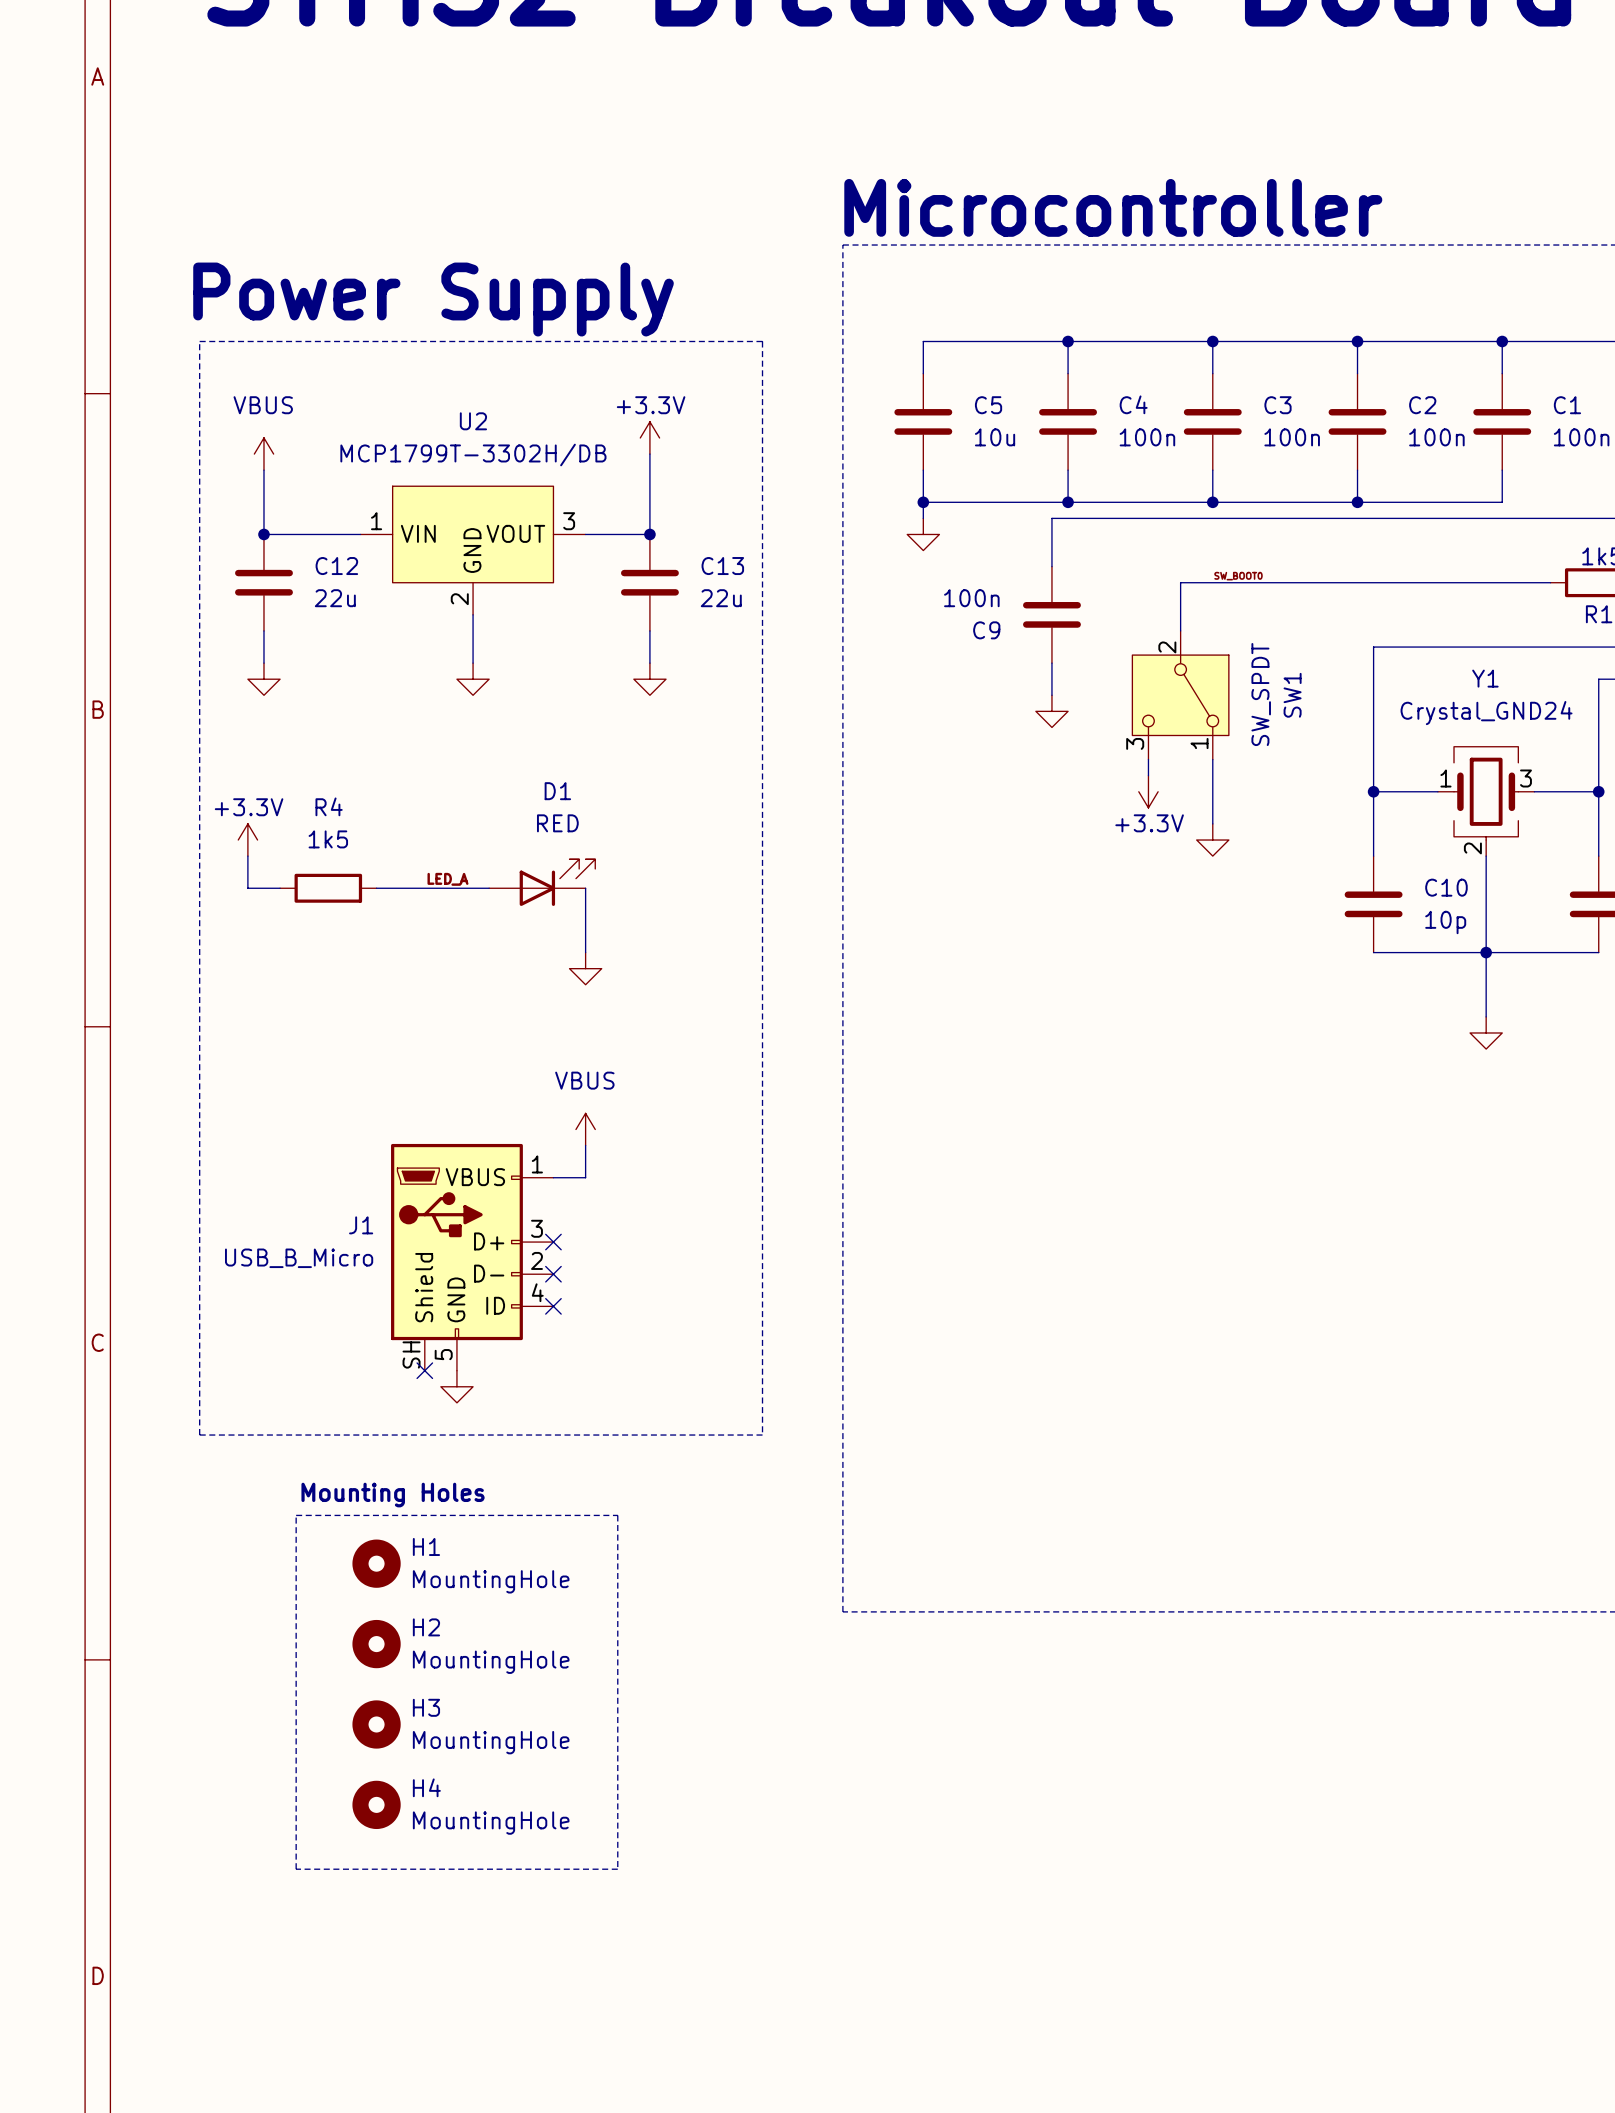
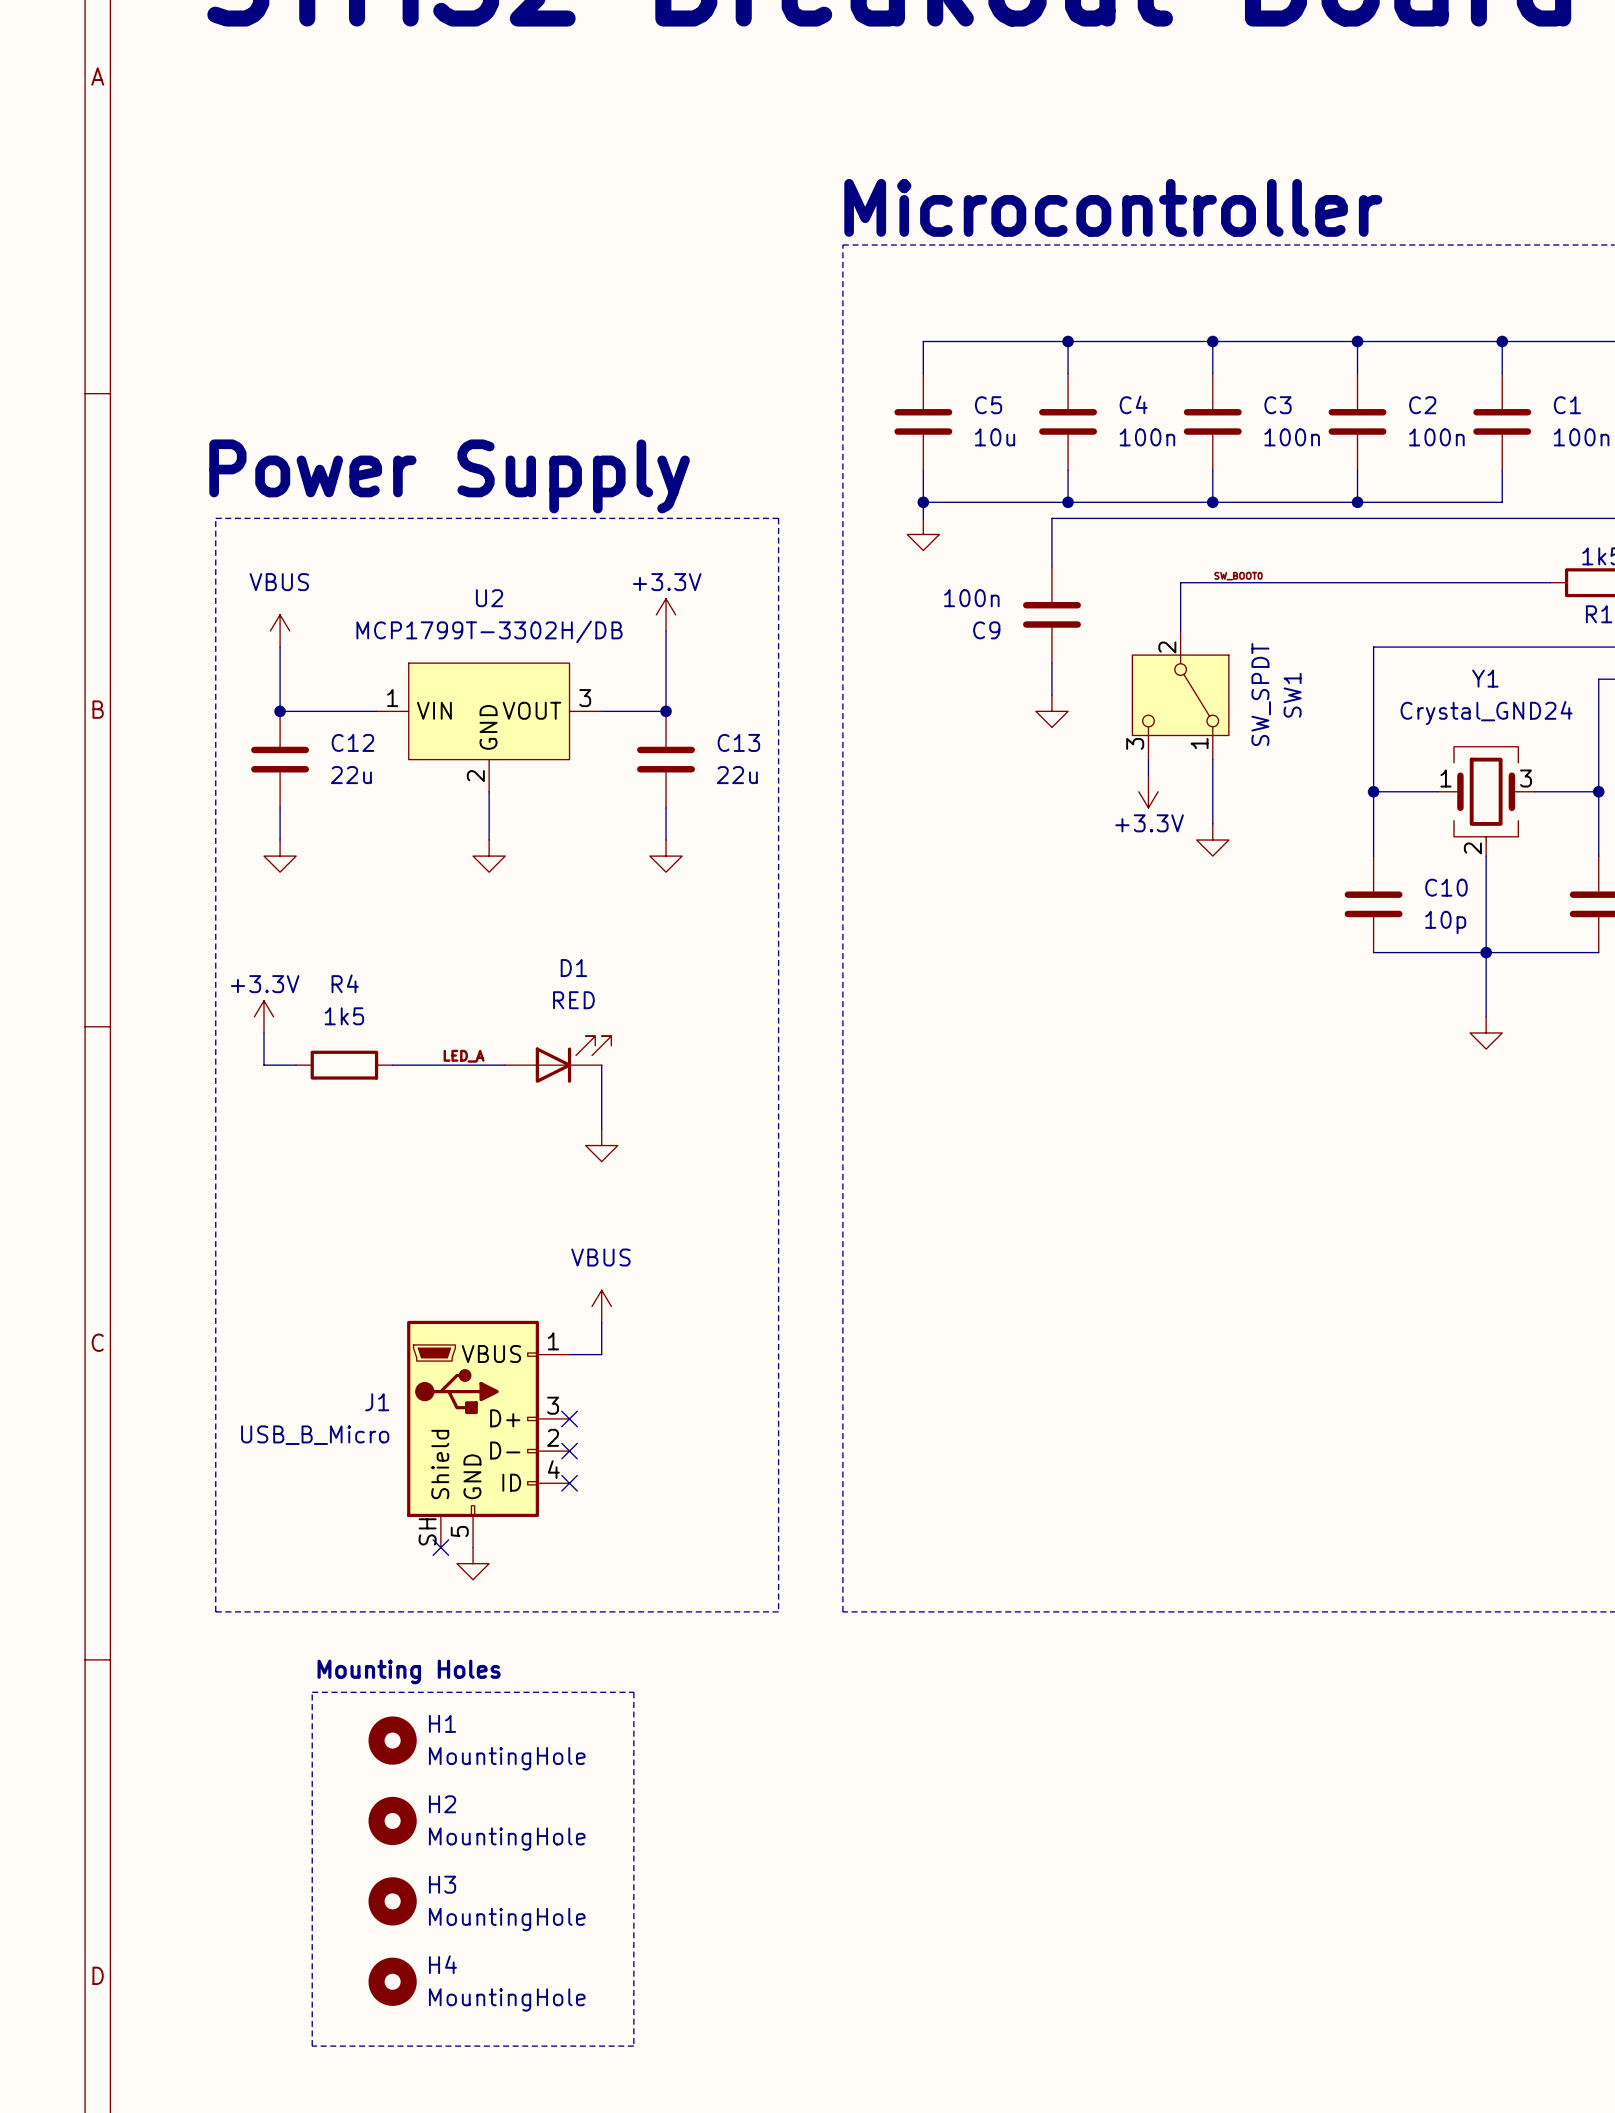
text position: Power Supply (433, 299) -> Power Supply (449, 476)
line: (199, 341) (762, 341) (762, 1435) (199, 1435) (199, 341) -> (215, 518) (778, 518) (778, 1611) (215, 1611) (215, 518)
power symbol position: +3.3V (649, 437) -> +3.3V (666, 614)
power symbol position: VBUS (263, 454) -> VBUS (280, 630)
wire: (649, 454) (649, 534) (585, 534) -> (666, 630) (666, 711) (601, 711)
wire: (263, 470) (263, 534) (360, 534) -> (280, 647) (280, 711) (376, 711)
junction: (263, 534) -> none
junction: (649, 534) -> none
U2 position: (473, 550) -> (489, 727)
C12 position: (263, 582) -> (280, 759)
C13 position: (649, 582) -> (666, 759)
wire: (473, 614) (473, 663) -> (489, 791) (489, 840)
wire: (263, 630) (263, 663) -> (280, 807) (280, 840)
wire: (649, 630) (649, 663) -> (666, 807) (666, 840)
power symbol: (263, 679) -> none
power symbol: (473, 679) -> none
power symbol: (649, 679) -> none
junction: none -> (280, 711)
junction: none -> (666, 711)
power symbol position: +3.3V (247, 840) -> +3.3V (263, 1016)
wire: (247, 856) (247, 888) (280, 888) -> (263, 1032) (263, 1065) (296, 1065)
power symbol: none -> (280, 856)
power symbol: none -> (489, 856)
power symbol: none -> (666, 856)
label position: LED_A (447, 879) -> LED_A (464, 1056)
D1 position: (542, 882) -> (558, 1059)
R4 position: (328, 888) -> (344, 1065)
wire: (376, 888) (489, 888) -> (392, 1065) (505, 1065)
wire: (585, 888) (585, 952) -> (601, 1065) (601, 1129)
power symbol: (585, 968) -> none
power symbol position: VBUS (585, 1129) -> VBUS (601, 1306)
wire: (585, 1145) (585, 1177) (553, 1177) -> (601, 1322) (601, 1354) (569, 1354)
power symbol: none -> (601, 1145)
no-connect mark: (553, 1242) -> none
J1 position: (472, 1257) -> (488, 1434)
no-connect mark: (553, 1274) -> none
no-connect mark: (553, 1306) -> none
no-connect mark: (424, 1370) -> none
power symbol: (456, 1386) -> none
no-connect mark: none -> (569, 1418)
no-connect mark: none -> (569, 1451)
no-connect mark: none -> (569, 1483)
text position: Mounting Holes (393, 1495) -> Mounting Holes (409, 1671)
line: (296, 1515) (617, 1515) (617, 1869) (296, 1869) (296, 1515) -> (312, 1692) (633, 1692) (633, 2046) (312, 2046) (312, 1692)
no-connect mark: none -> (440, 1547)
H1 position: (376, 1563) -> (392, 1740)
power symbol: none -> (473, 1563)
H2 position: (376, 1644) -> (392, 1820)
H3 position: (376, 1724) -> (392, 1901)
H4 position: (376, 1804) -> (392, 1981)

